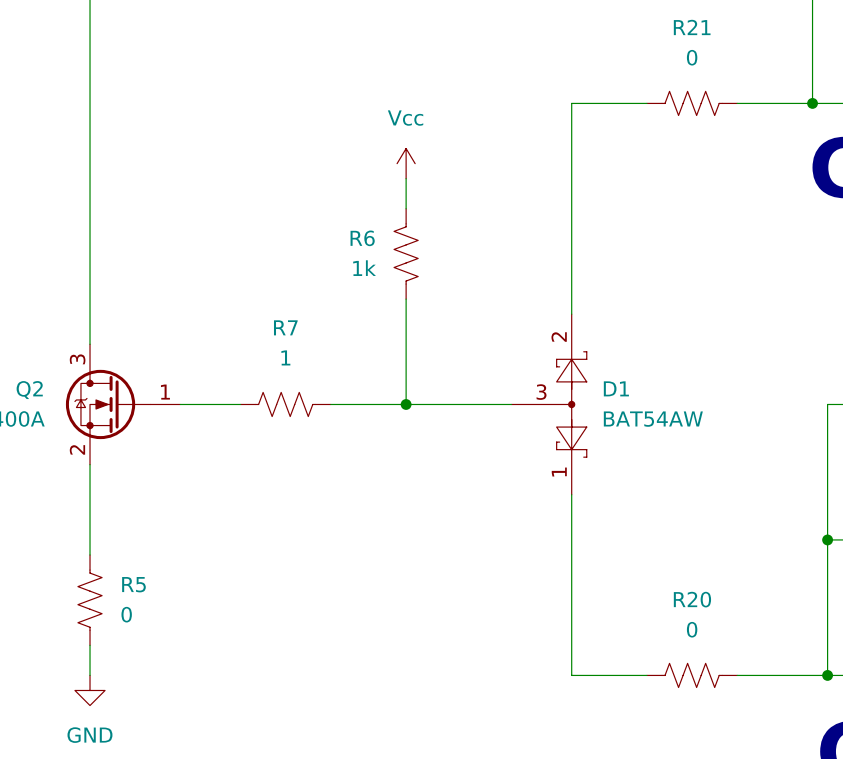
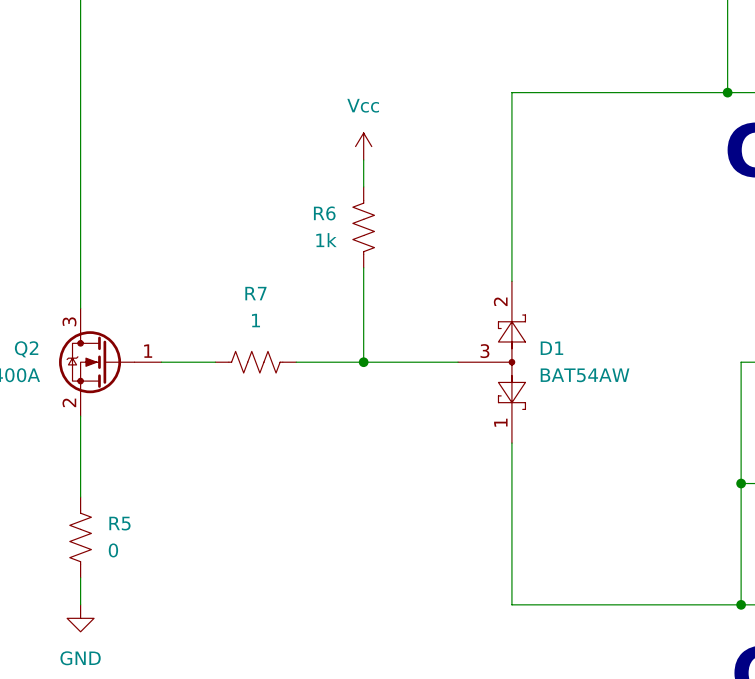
R21: 0 (692, 103) -> none
R20: 0 (692, 675) -> none

